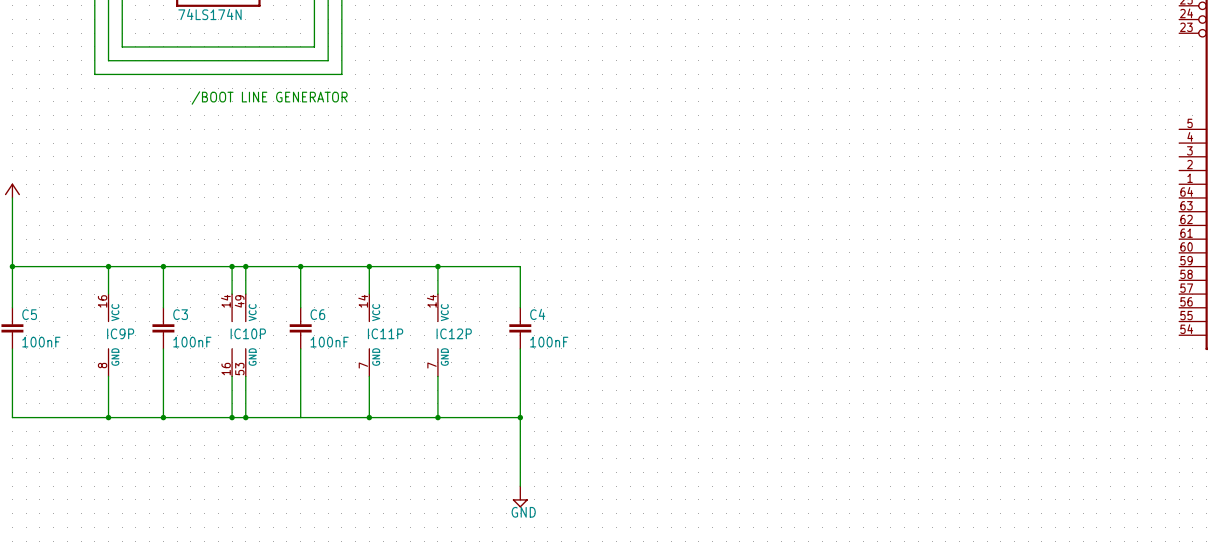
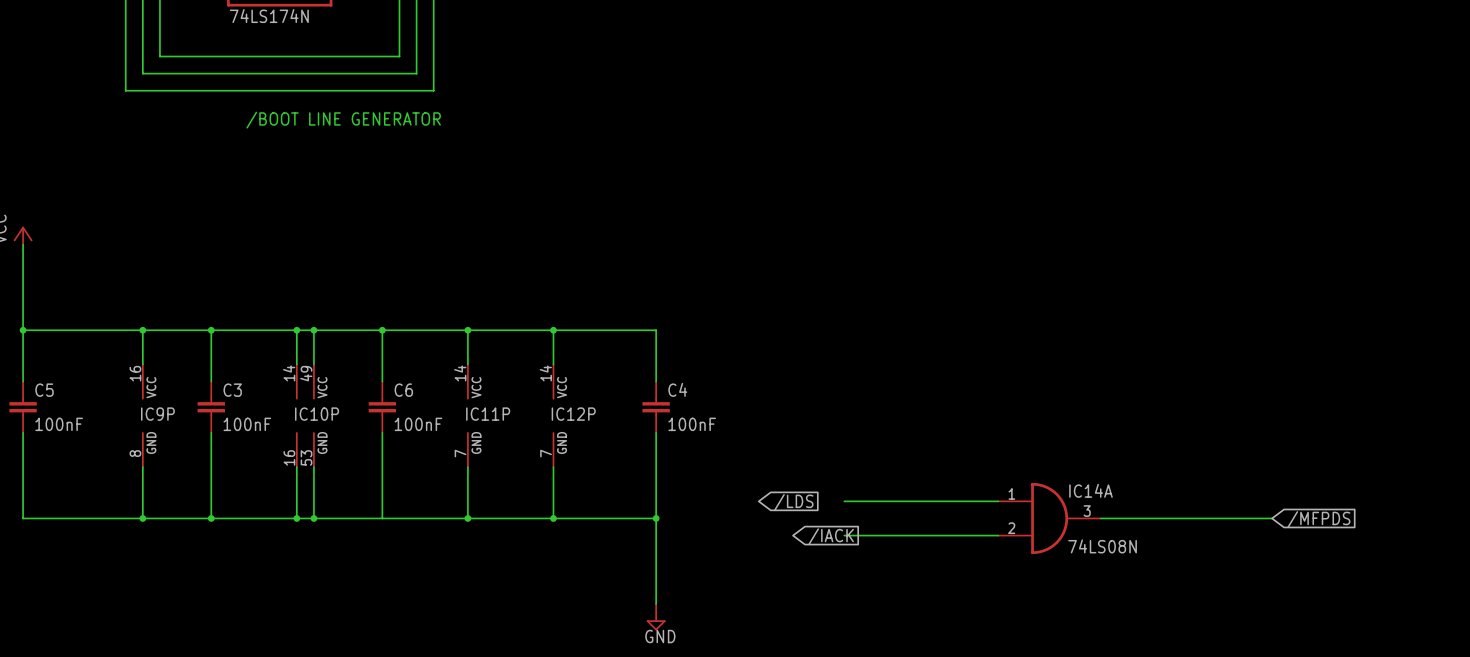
wire: none -> (844, 501) (998, 501)
global label: none -> /LDS (793, 502)
IC14A: none -> 74LS08N (1049, 518)
wire: none -> (1100, 518) (1272, 518)
global label: none -> /MFPDS (1318, 519)
wire: none -> (844, 535) (998, 535)
global label: none -> /IACK (831, 536)

